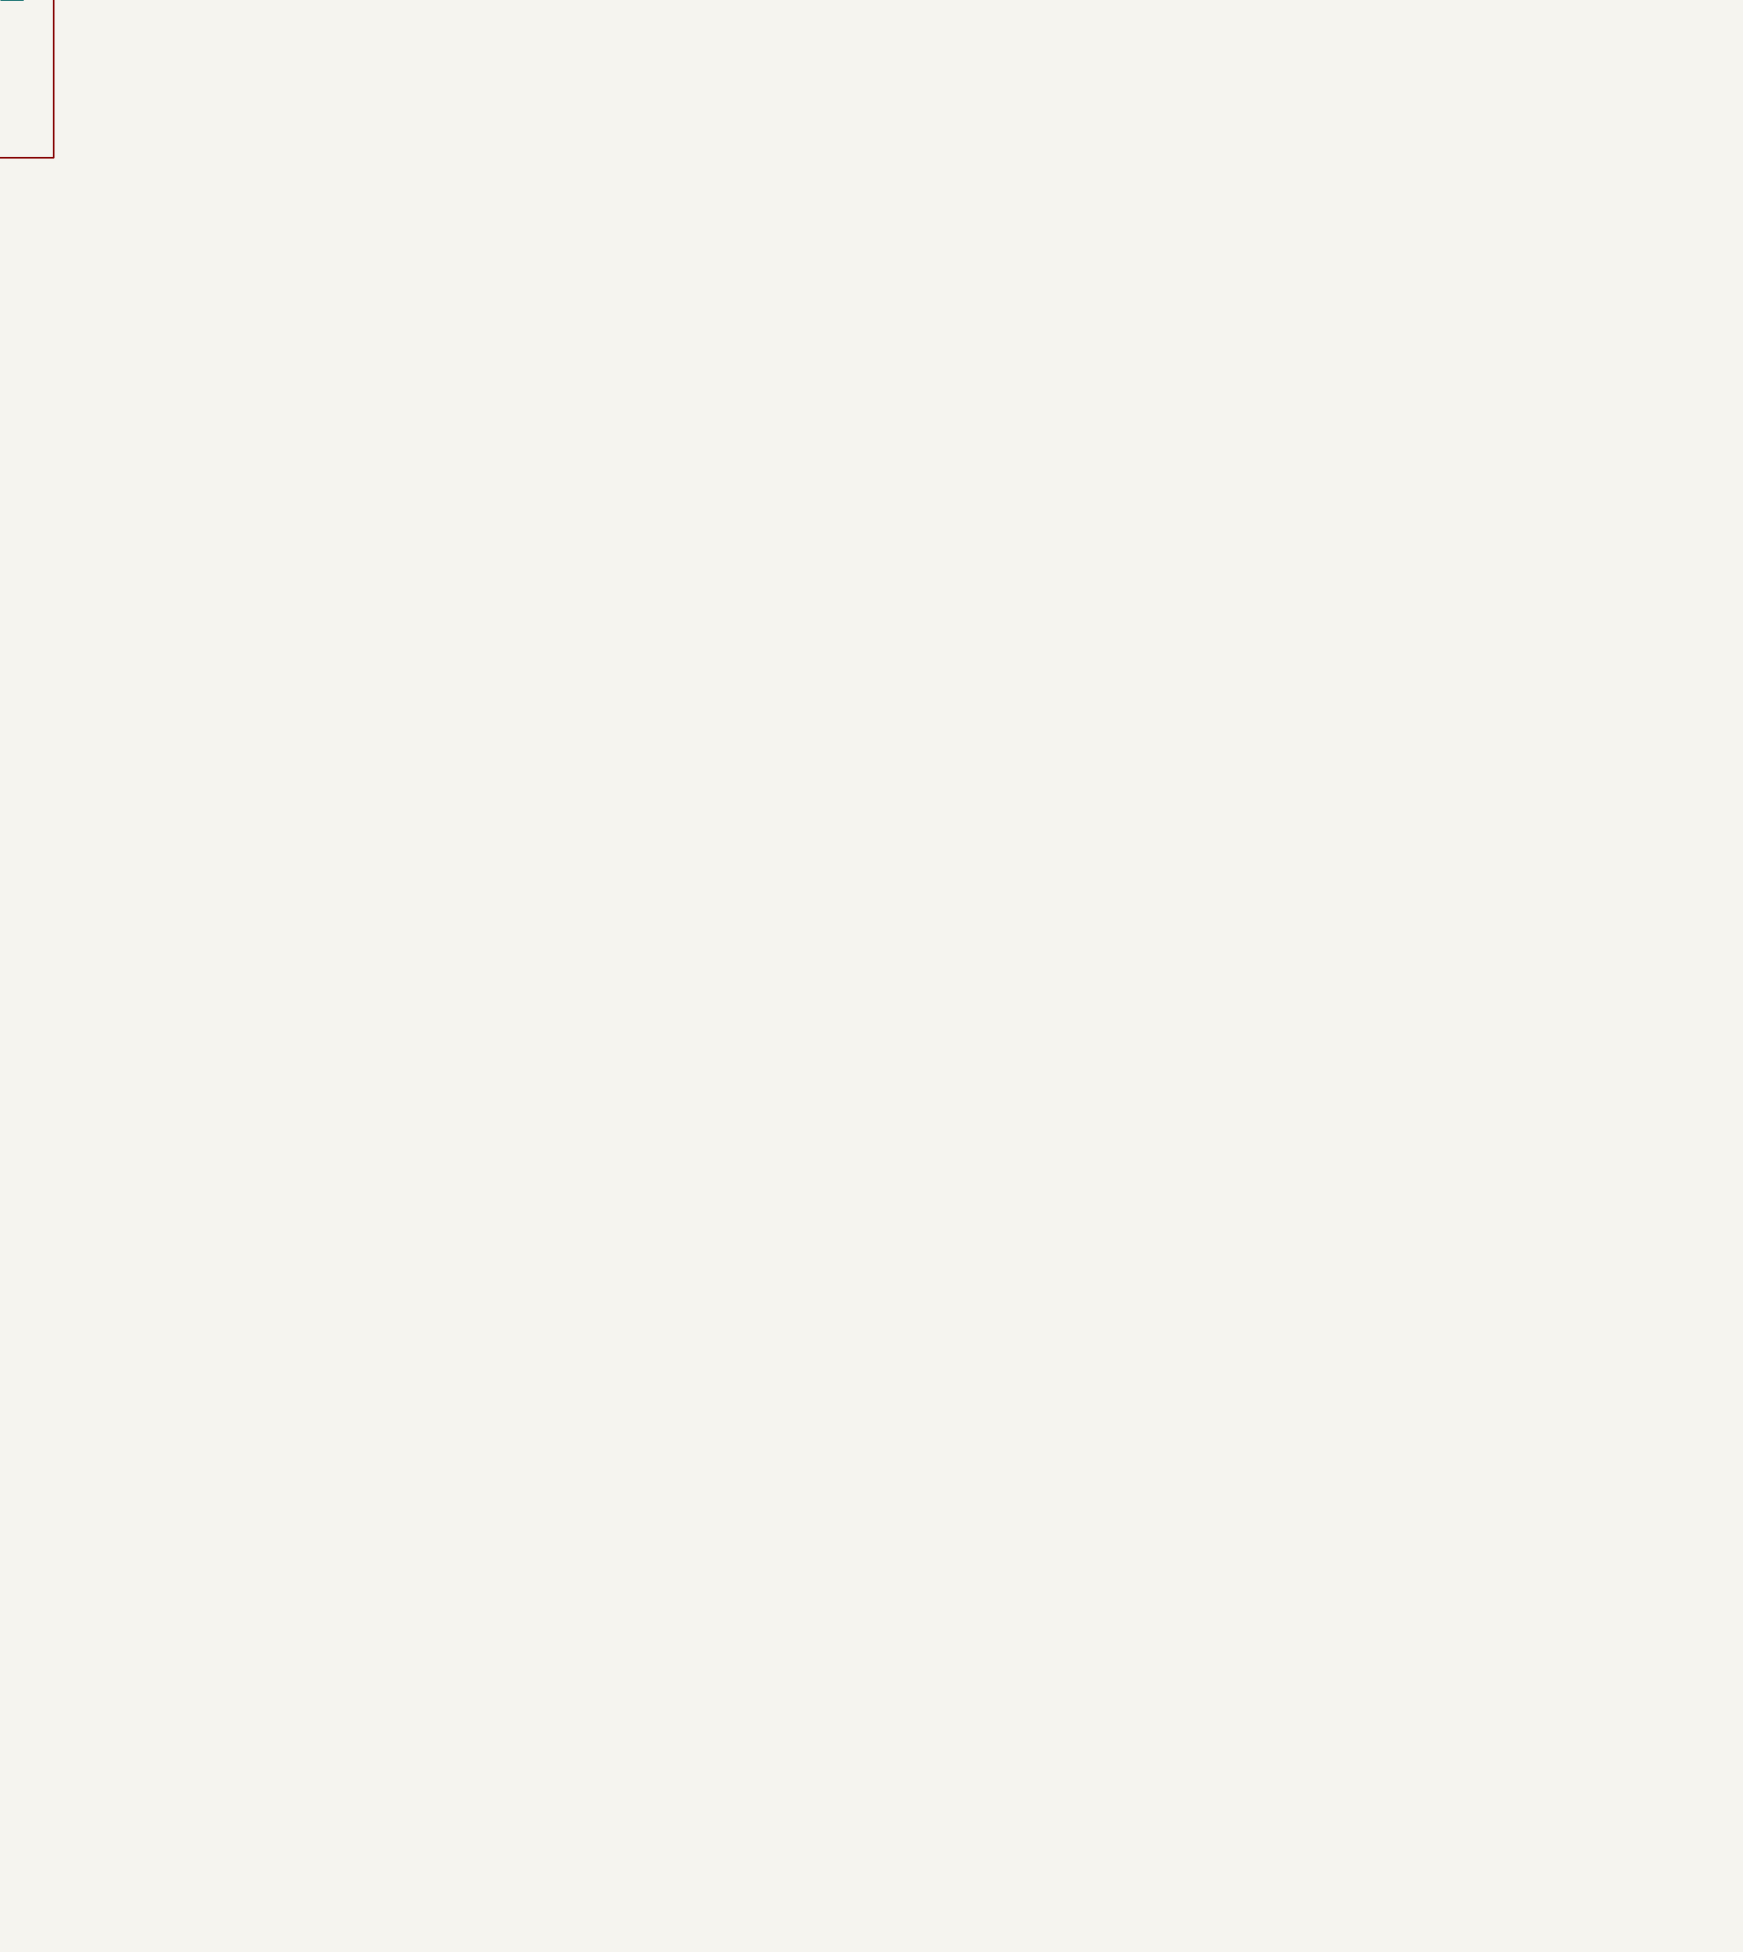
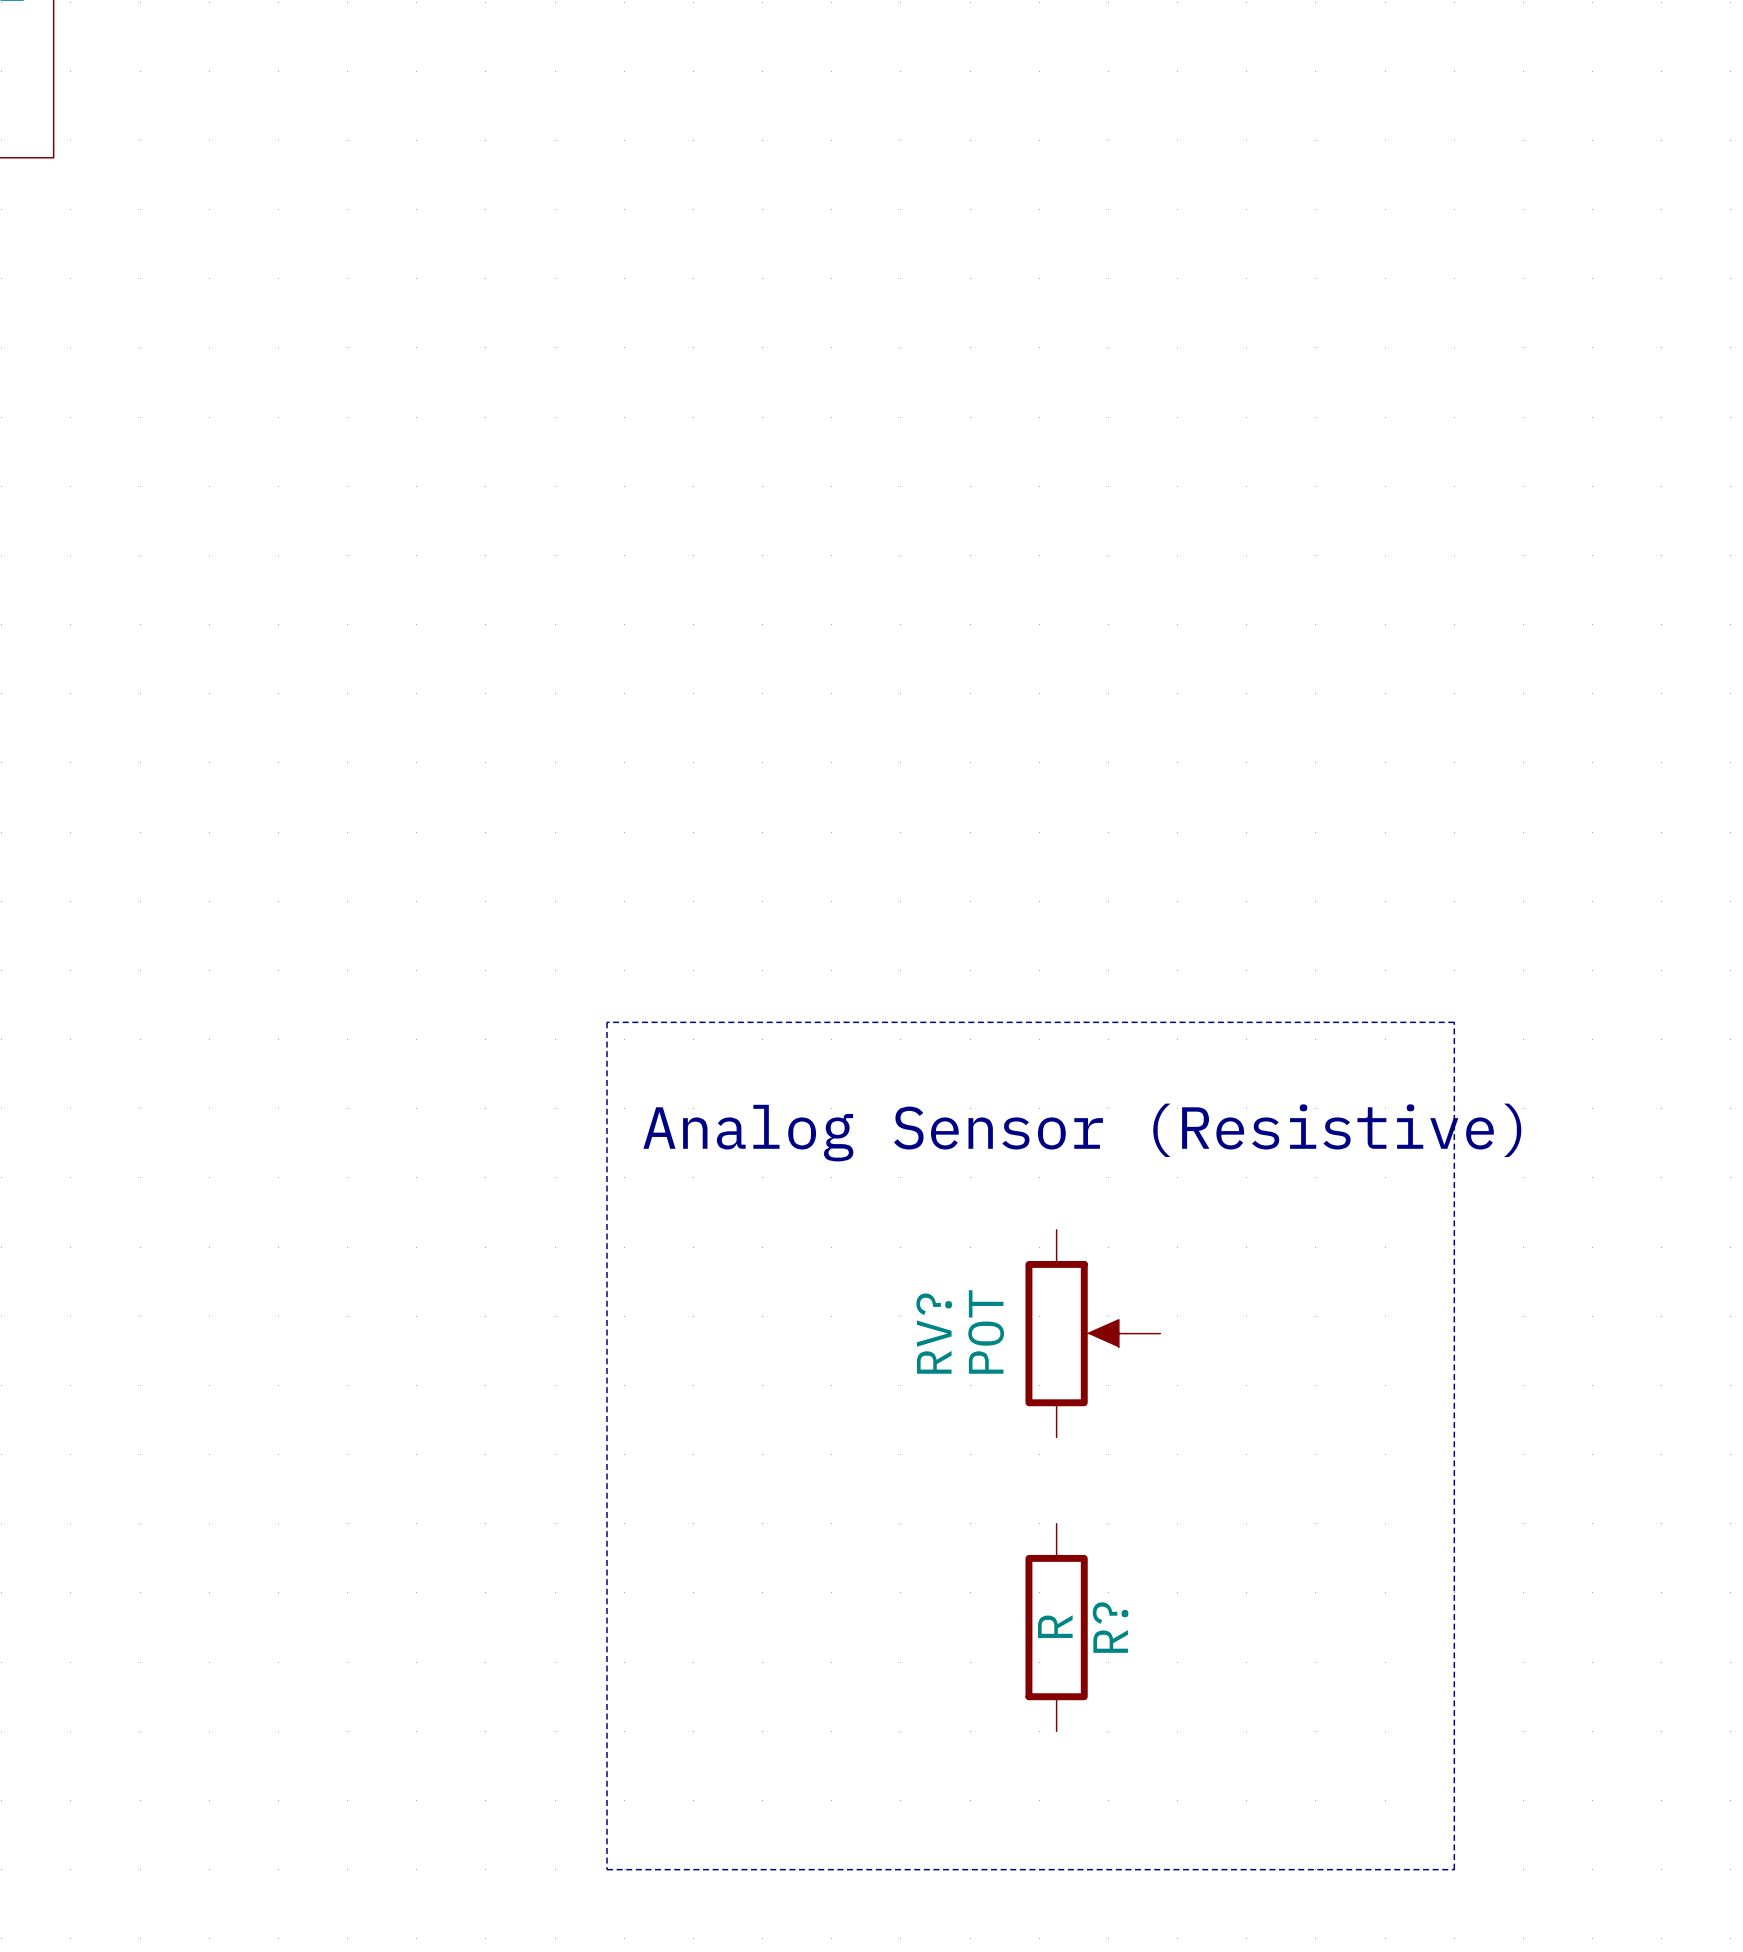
line: none -> (607, 1022) (607, 1869) (1454, 1869) (1454, 1022) (607, 1022)
text: none -> Analog Sensor (Resistive) (1082, 1132)
RV?: none -> POT (1092, 1333)
R?: none -> R (1056, 1627)

